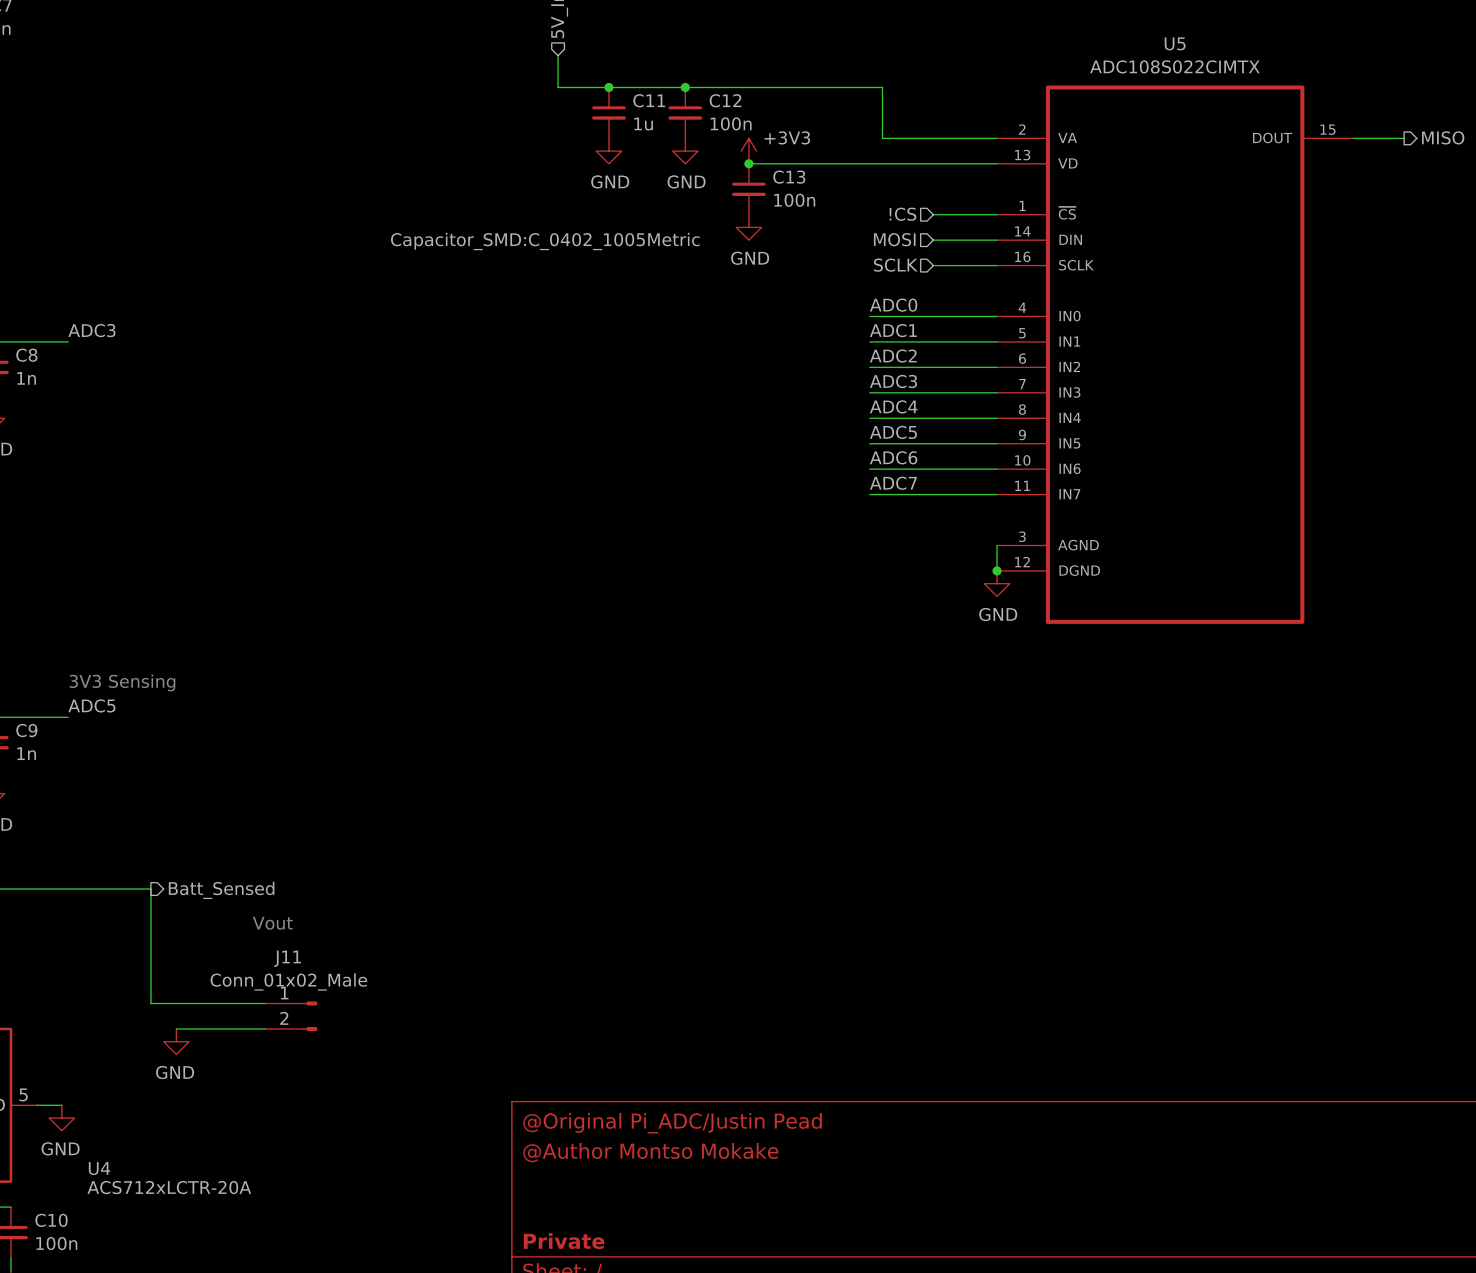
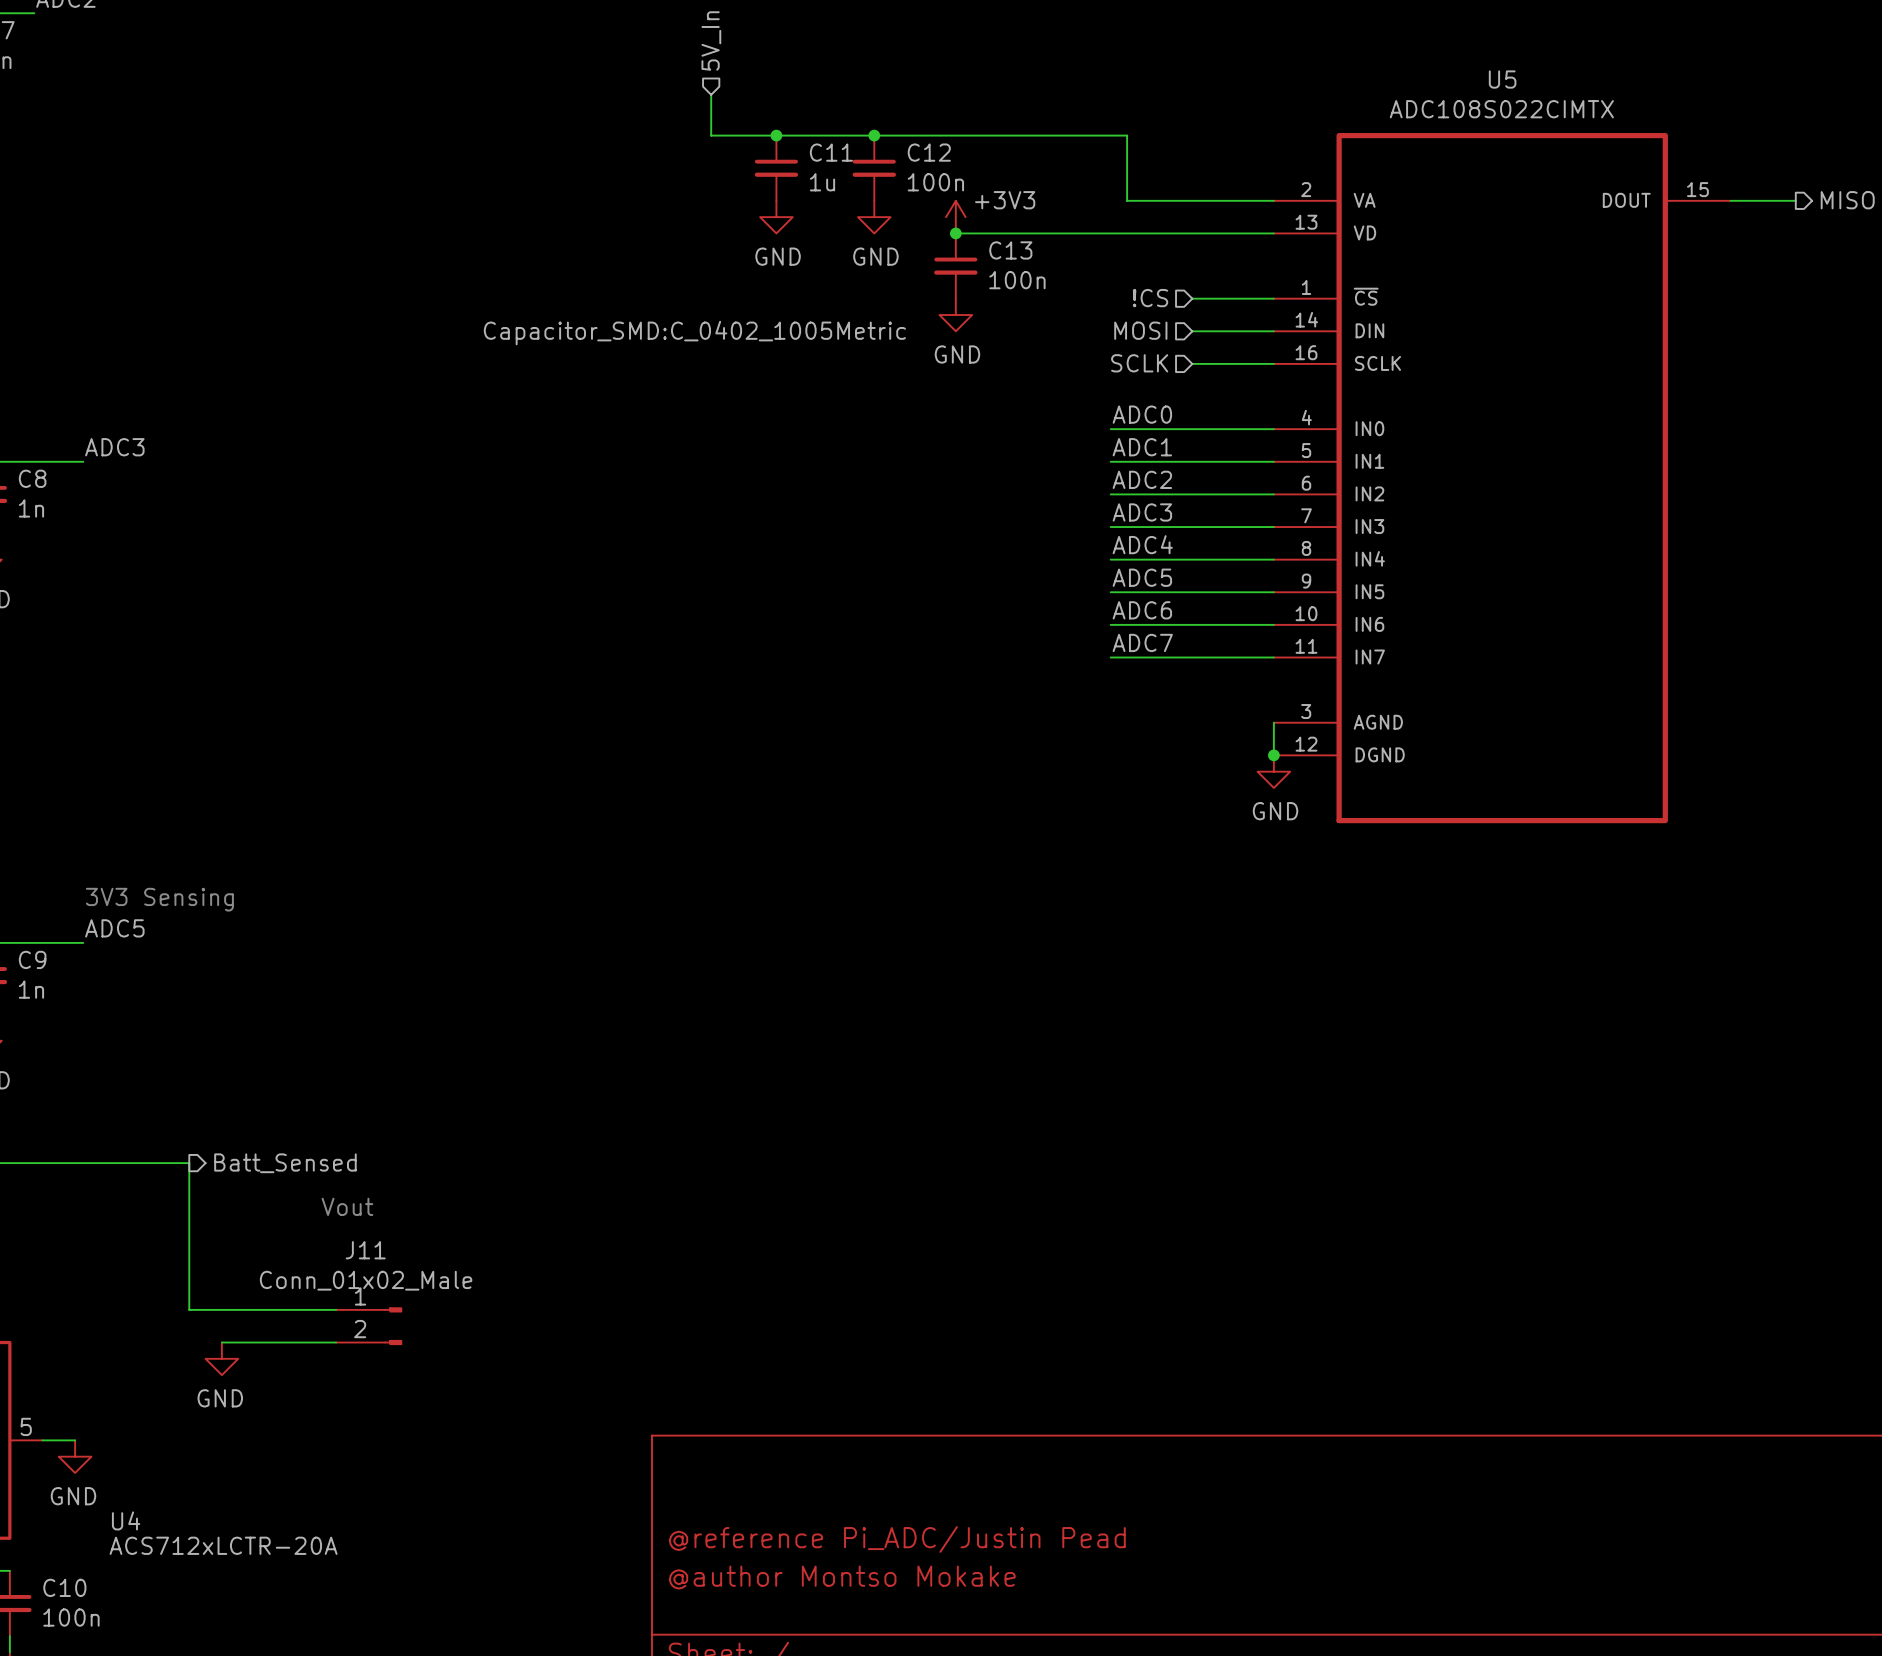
title block: @Original Pi_ADC/Justin Pead (672, 1123) -> none
title block: @Author Montso Mokake (650, 1152) -> none
title block: none -> @reference Pi_ADC/Justin Pead (897, 1539)
title block: none -> @author Montso Mokake (842, 1577)
title block: Private (564, 1241) -> none

